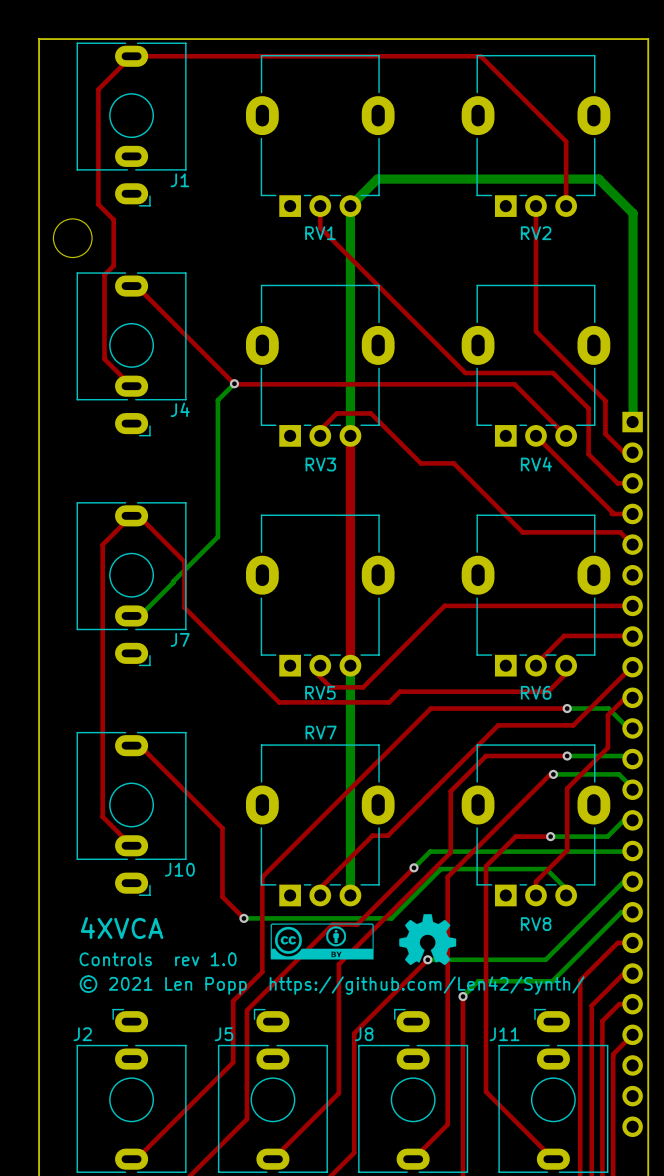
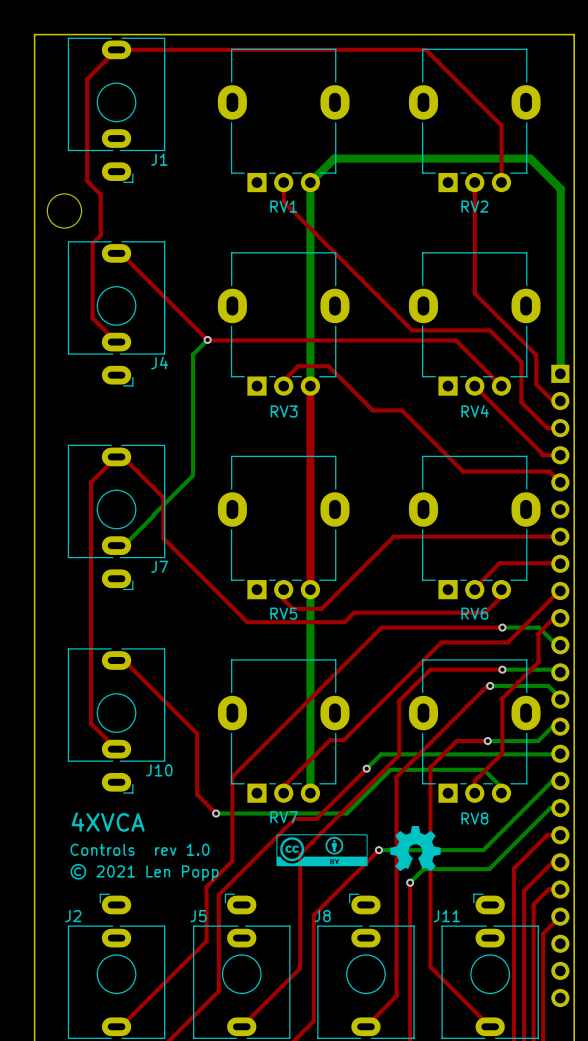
RV7 name position: RV7 (321, 732) -> RV7 (284, 817)
drawing position: (427, 939) -> (415, 848)
drawing position: (322, 941) -> (322, 850)
text: https://github.com/Len42/Synth/ (427, 985) -> none

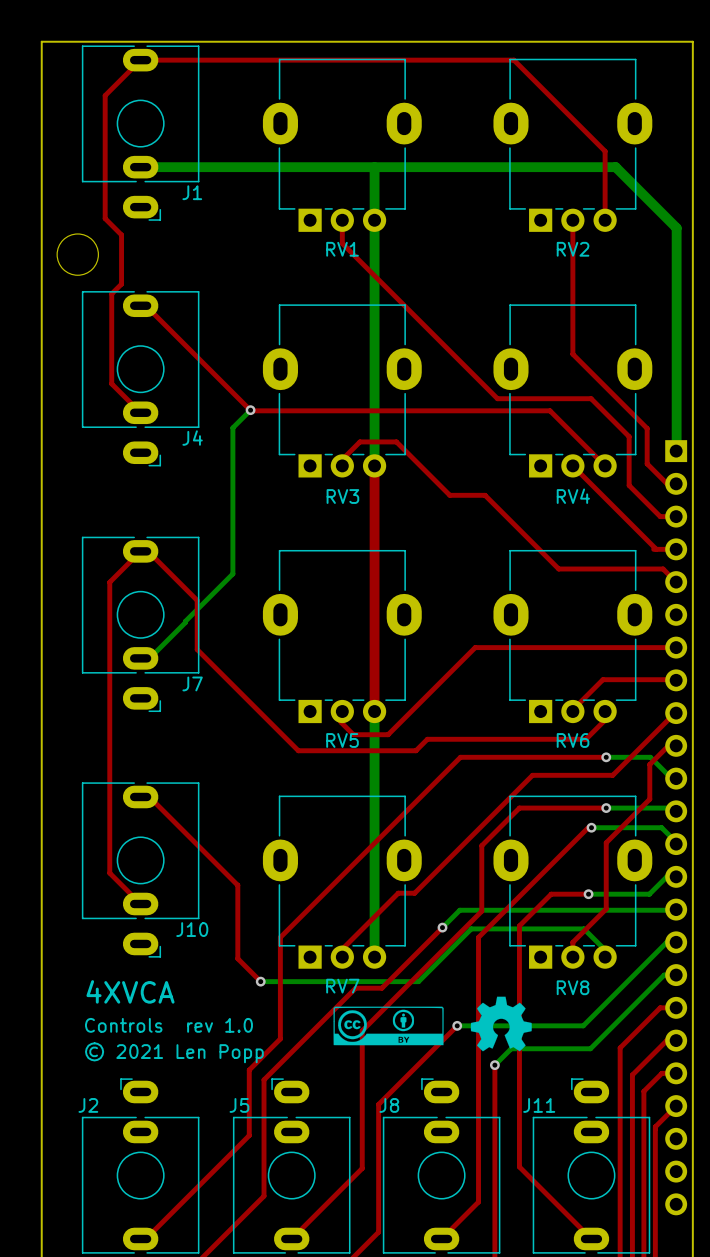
bottom track: none -> (374, 167) (374, 220)
bottom track: (530, 158) (334, 158) (310, 182) -> (639, 191) (615, 167) (149, 167)

